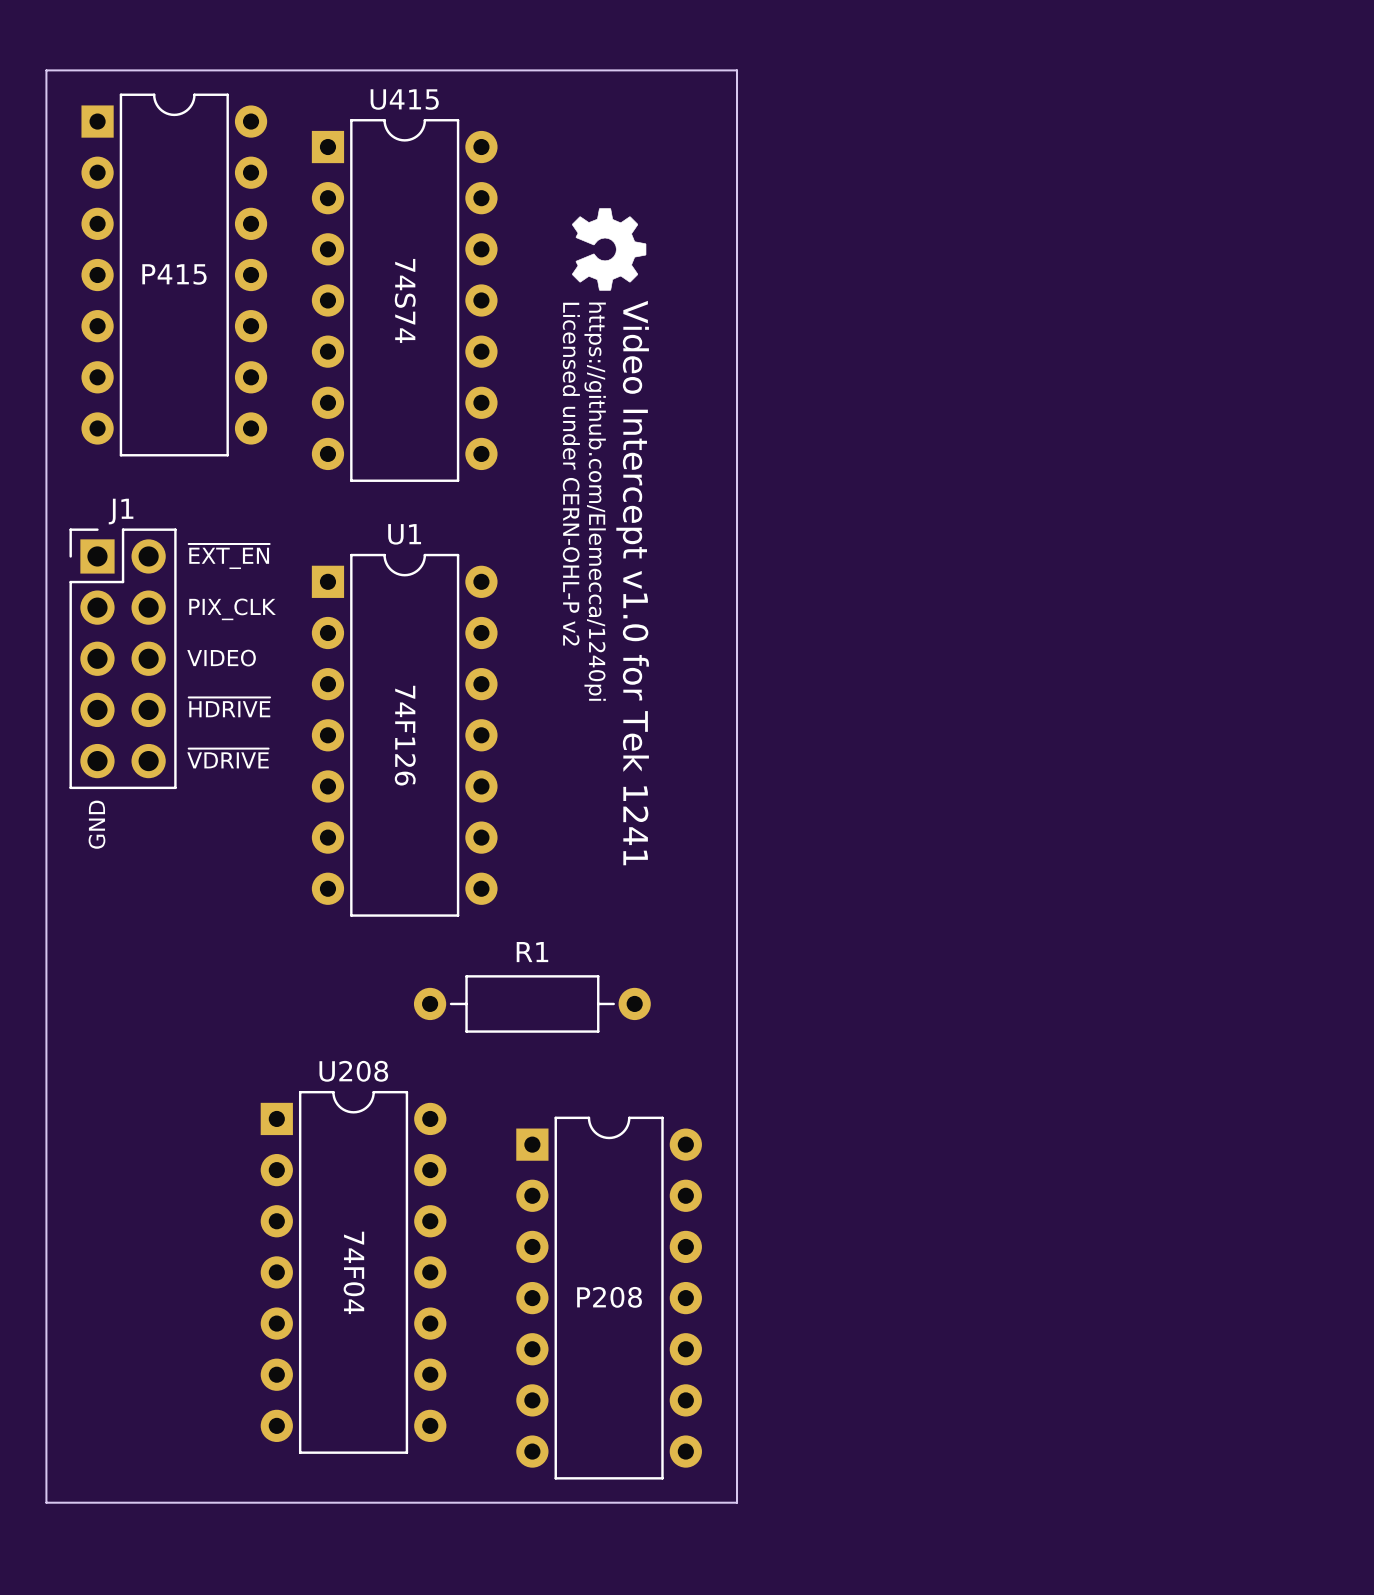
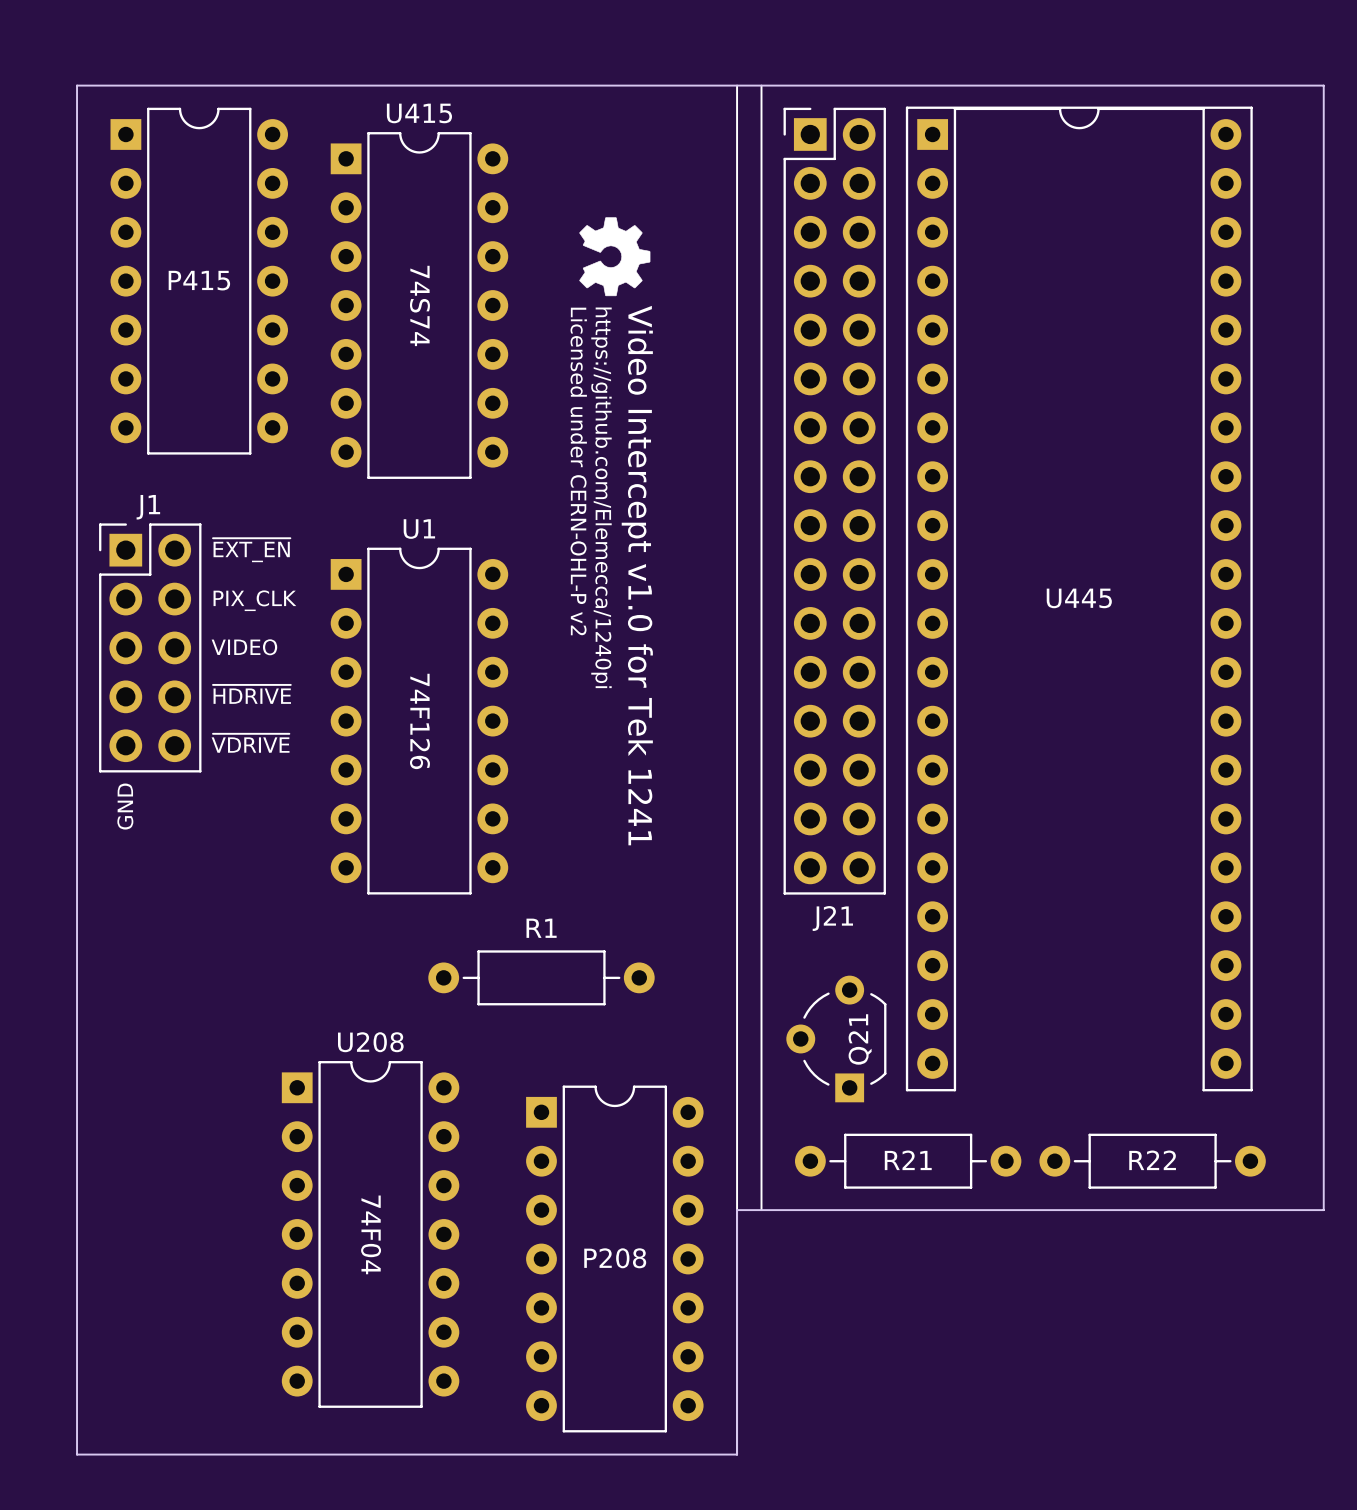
board edge: (737, 70) (737, 1246) -> (737, 85) (1323, 85) (1323, 1210) (737, 1210)
line: none -> (737, 85) (737, 1454)
line: none -> (761, 85) (761, 1210)
J21: none -> (834, 501)
U445: none -> (1079, 598)
Q21: none -> (836, 1038)
R21: none -> (908, 1161)
R22: none -> (1152, 1161)

